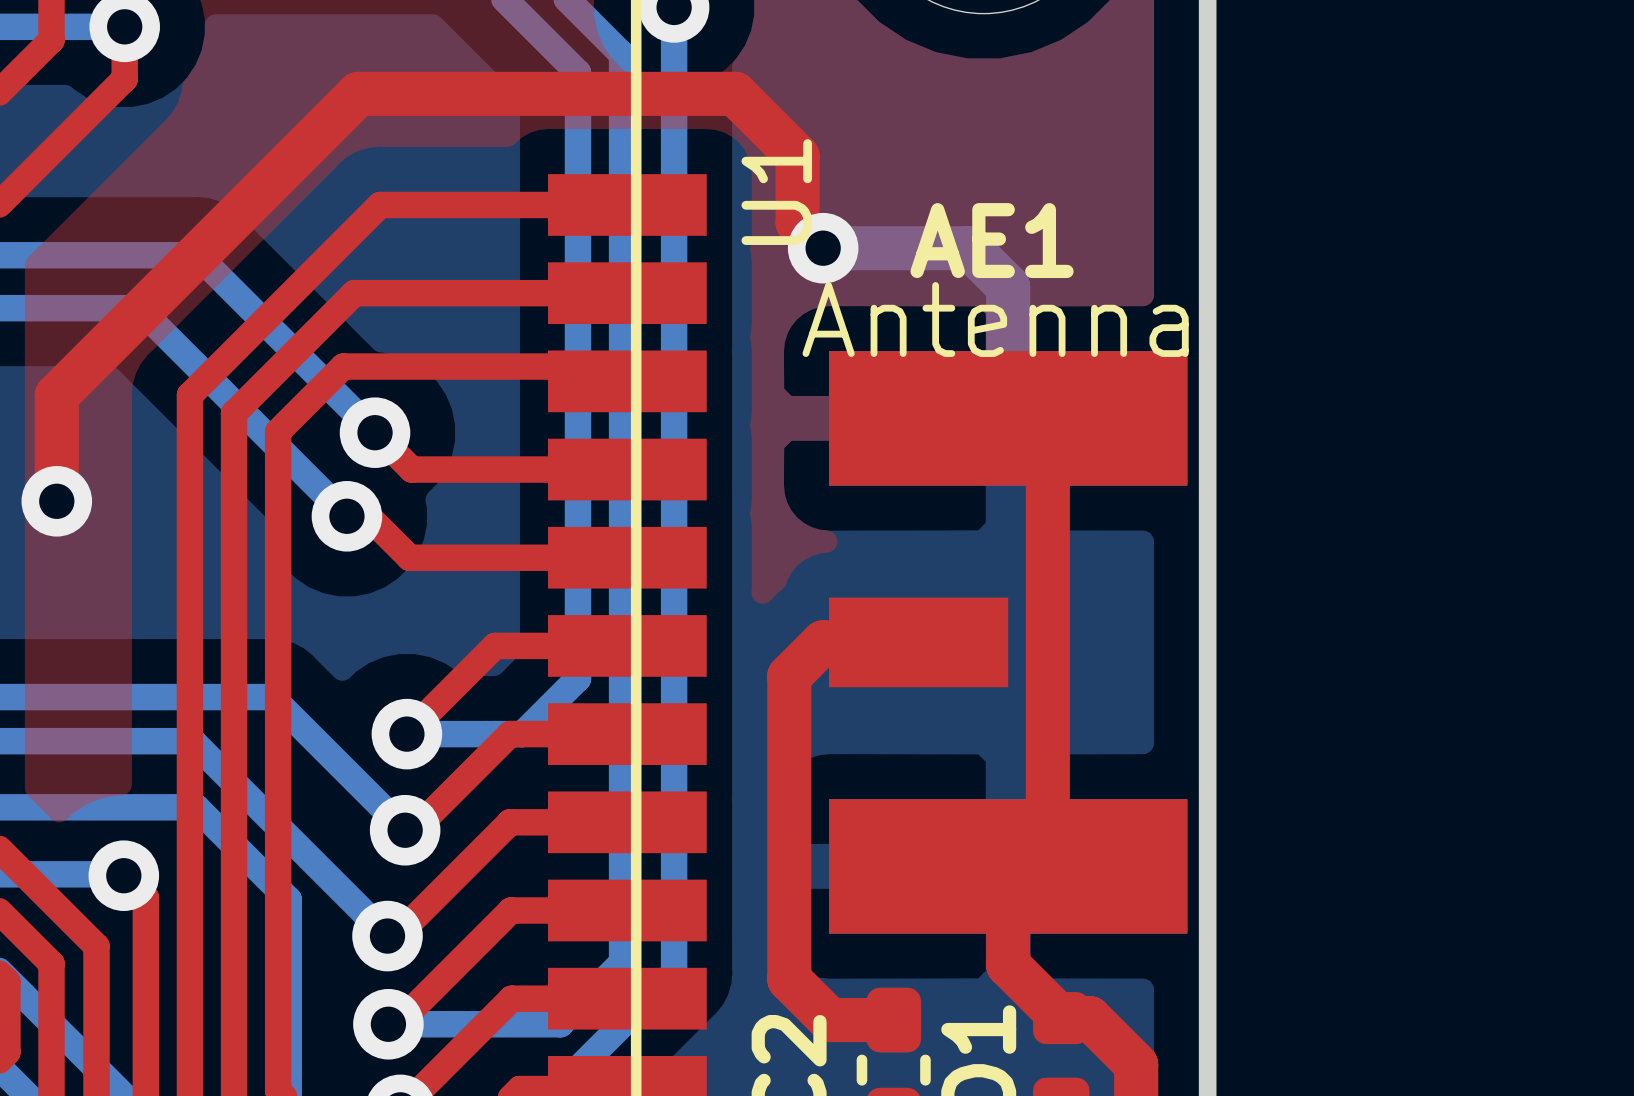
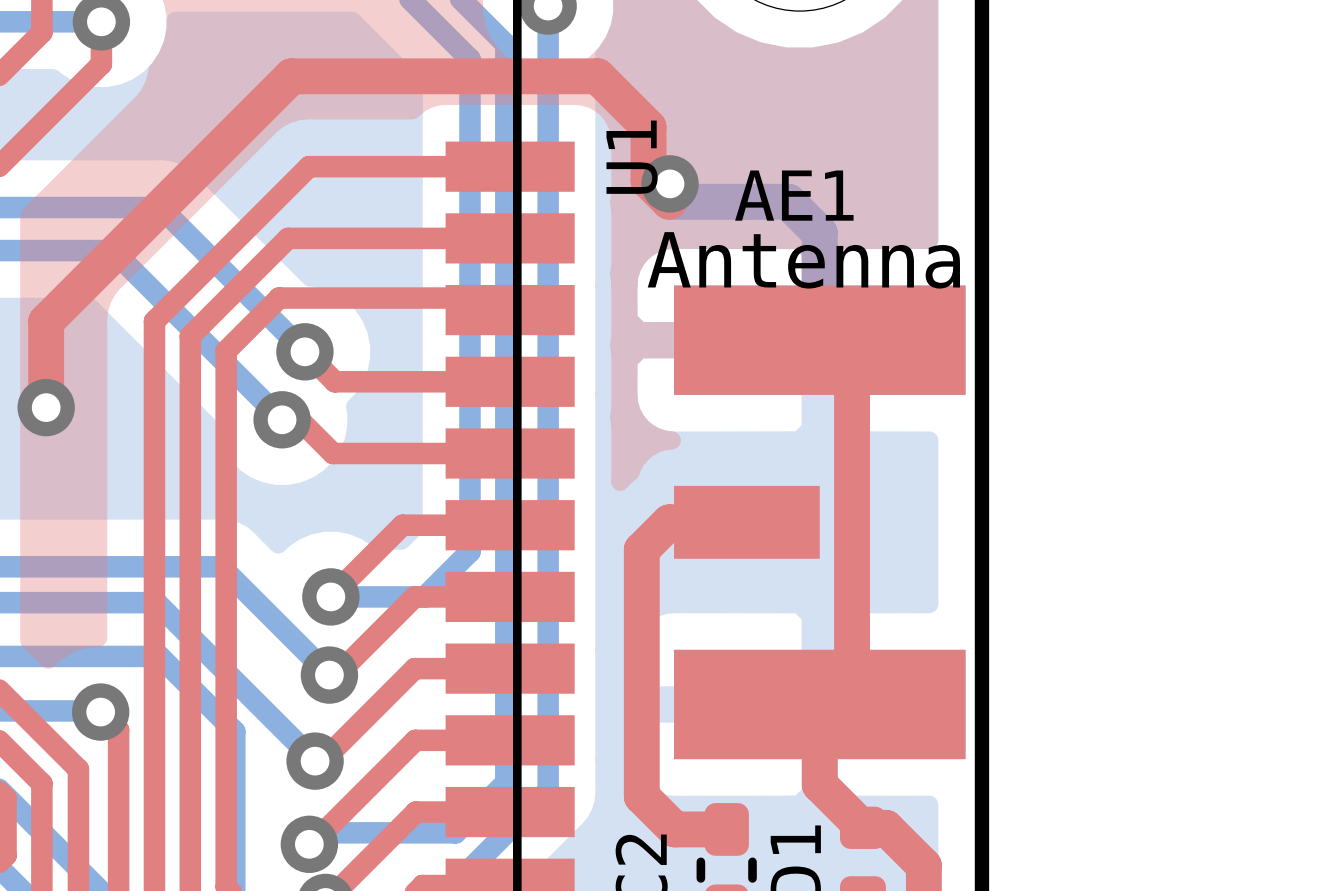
via position: (823, 248) -> (670, 183)
via position: (388, 1024) -> (309, 844)

